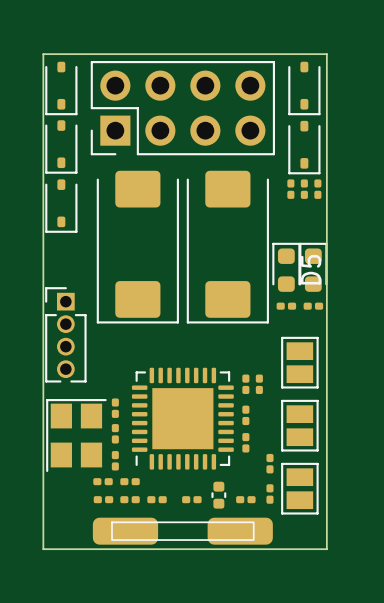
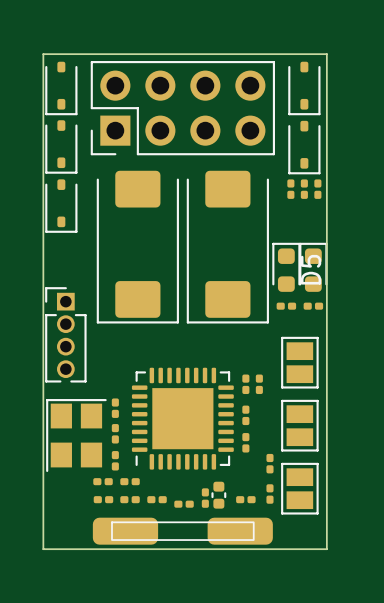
part: none -> (205, 498)
part: (191, 499) -> none
part: none -> (184, 504)

